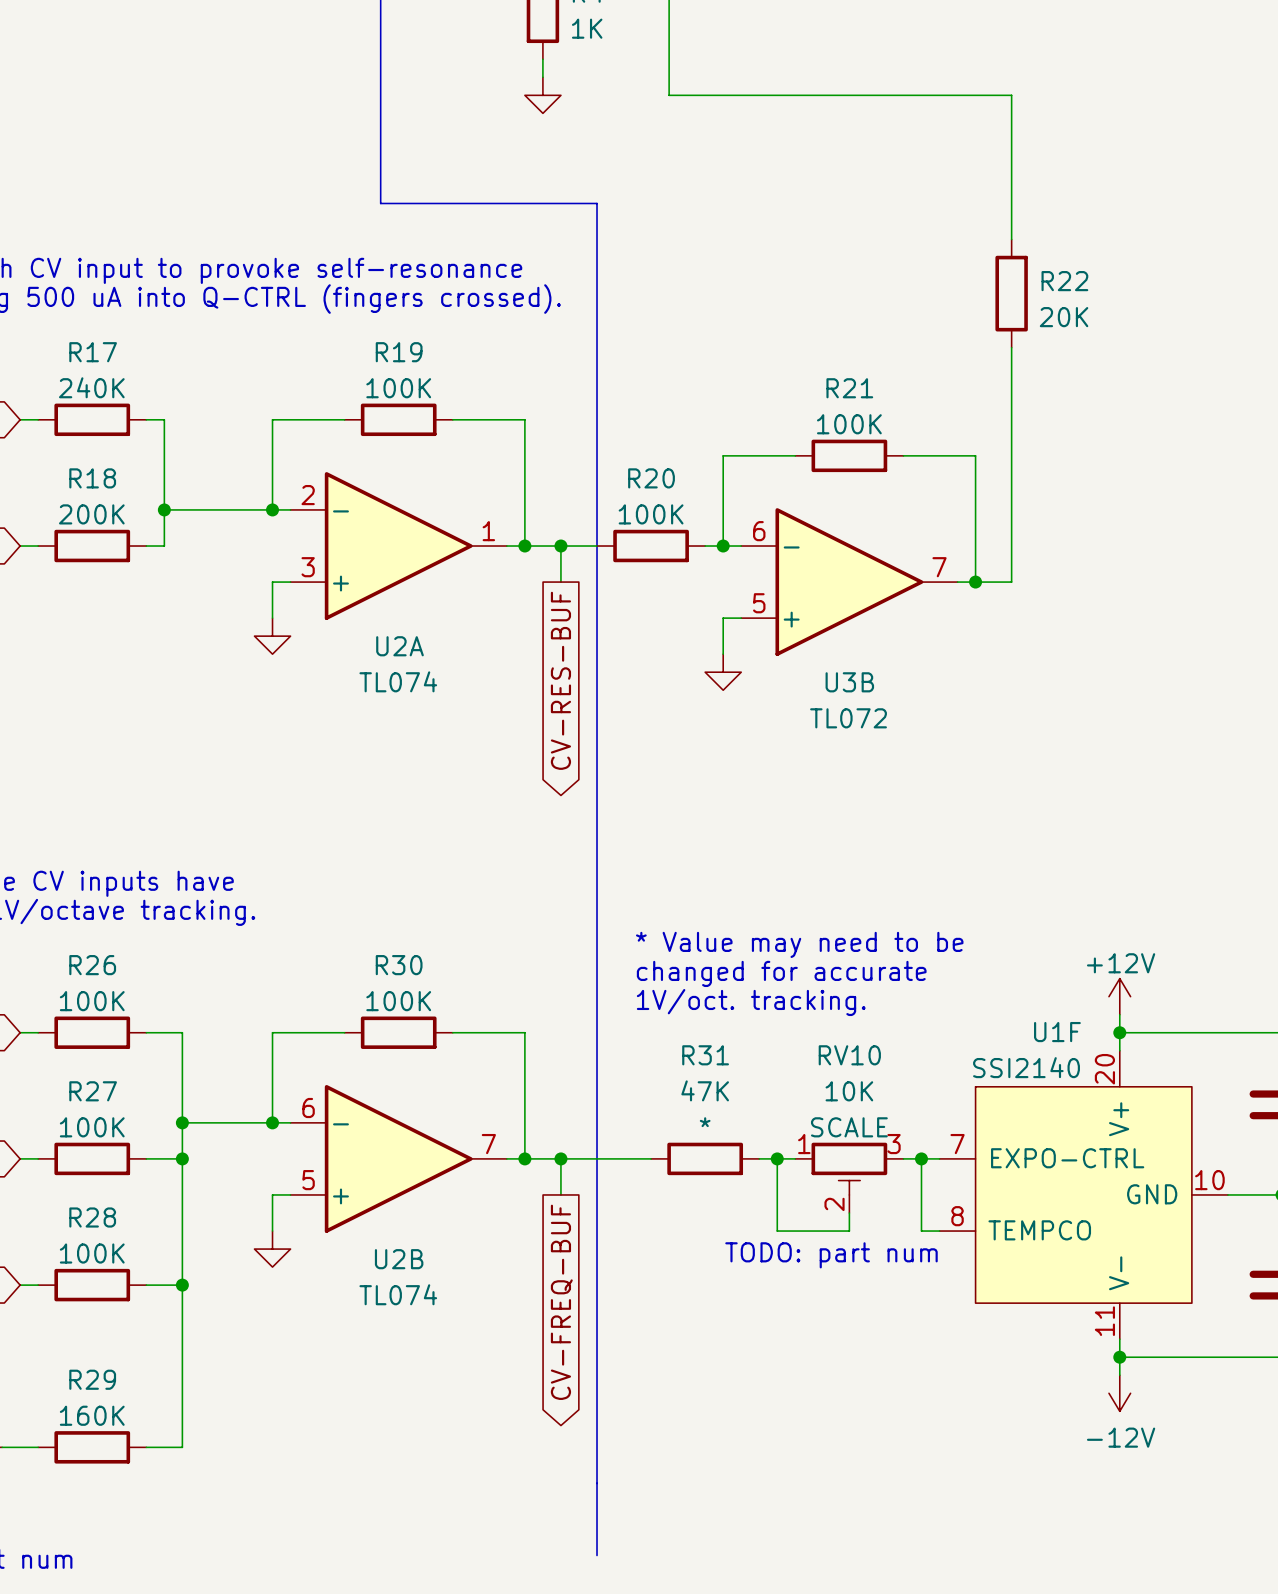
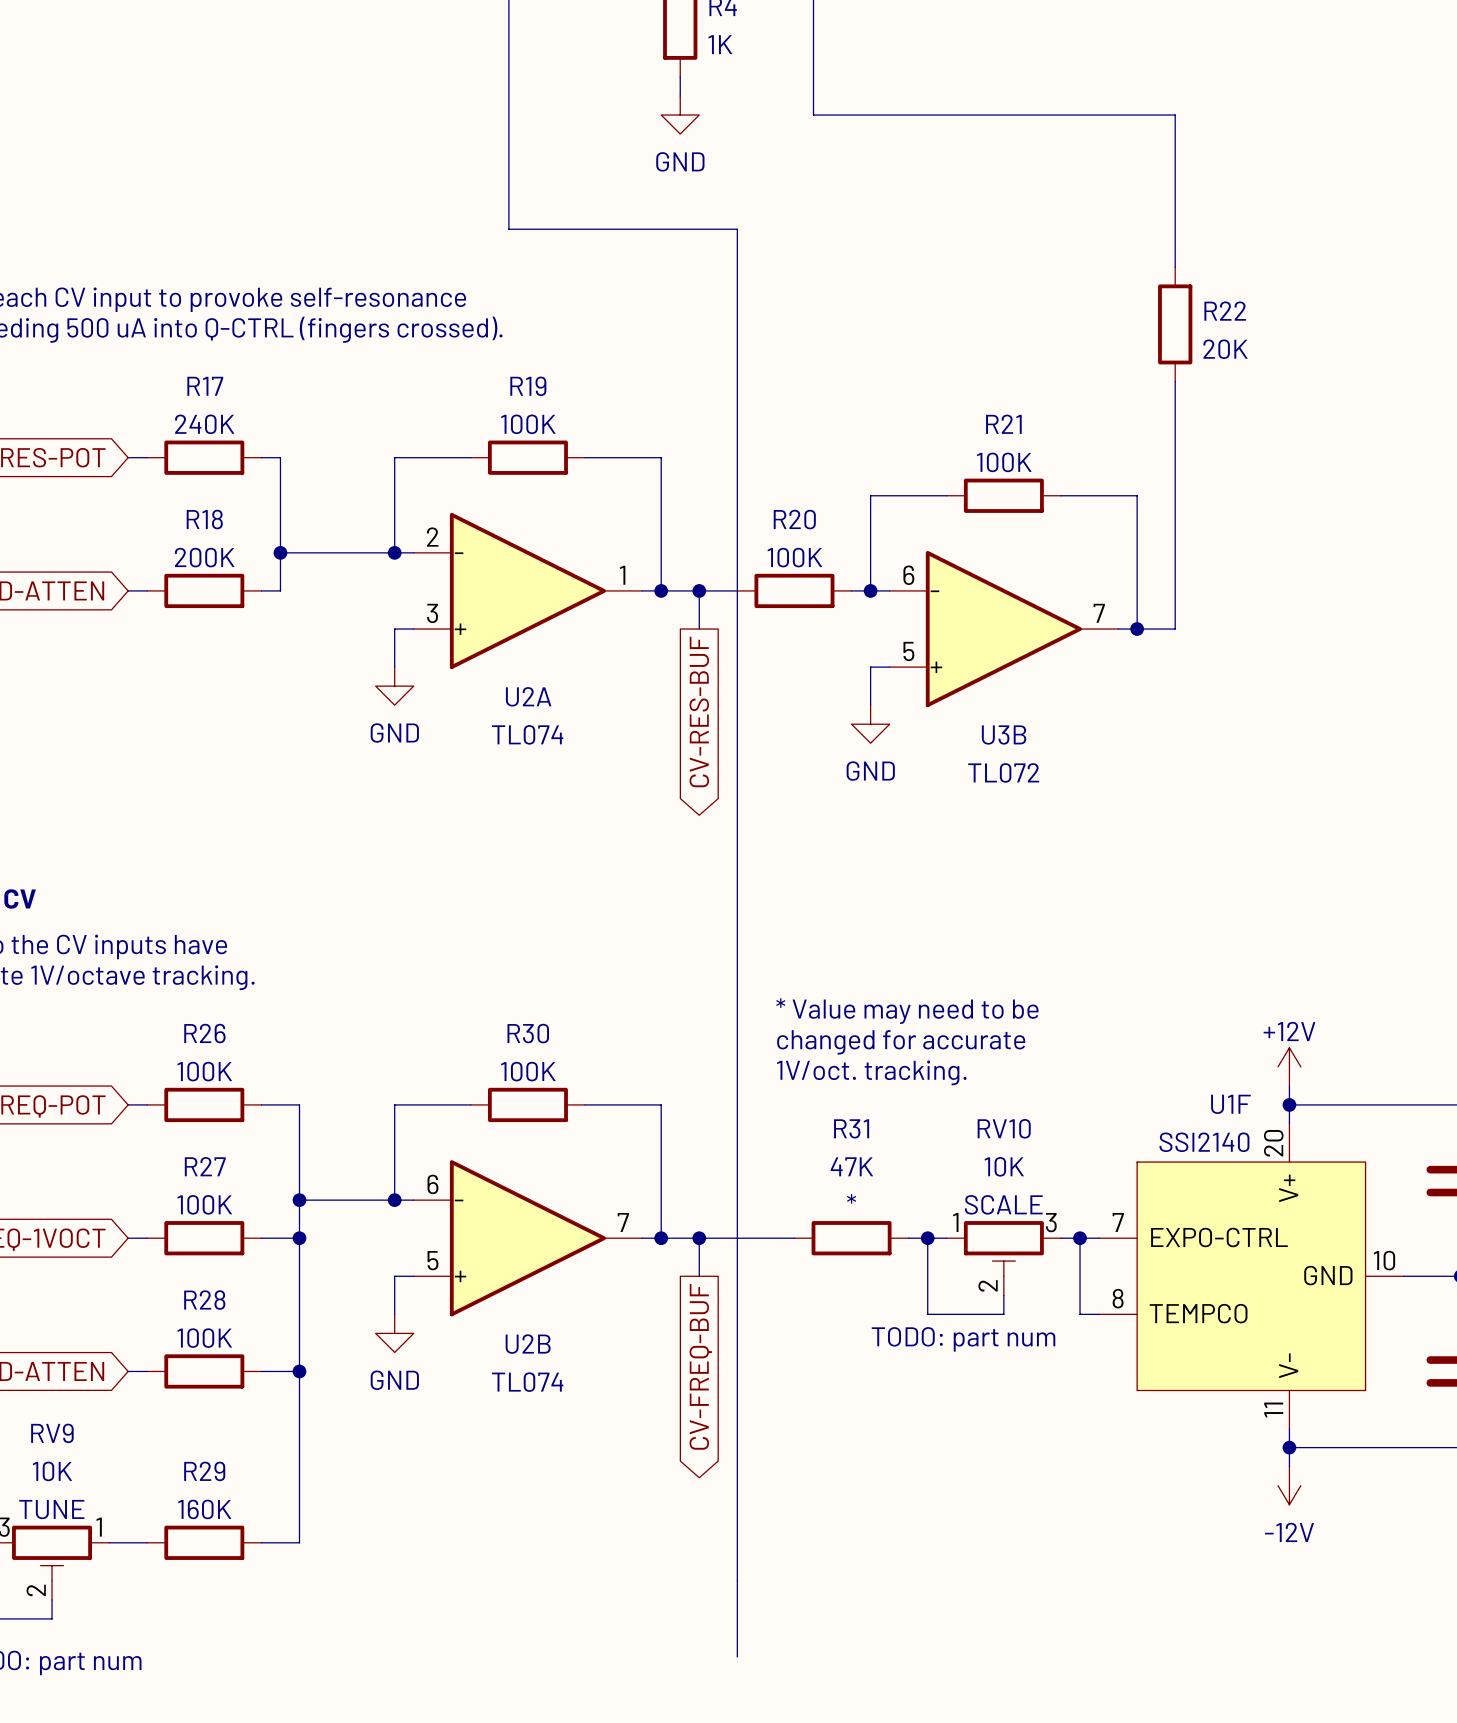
power symbol text: none -> GND (680, 161)
power symbol text: none -> GND (394, 732)
power symbol text: none -> GND (870, 771)
power symbol text: none -> GND (394, 1380)

